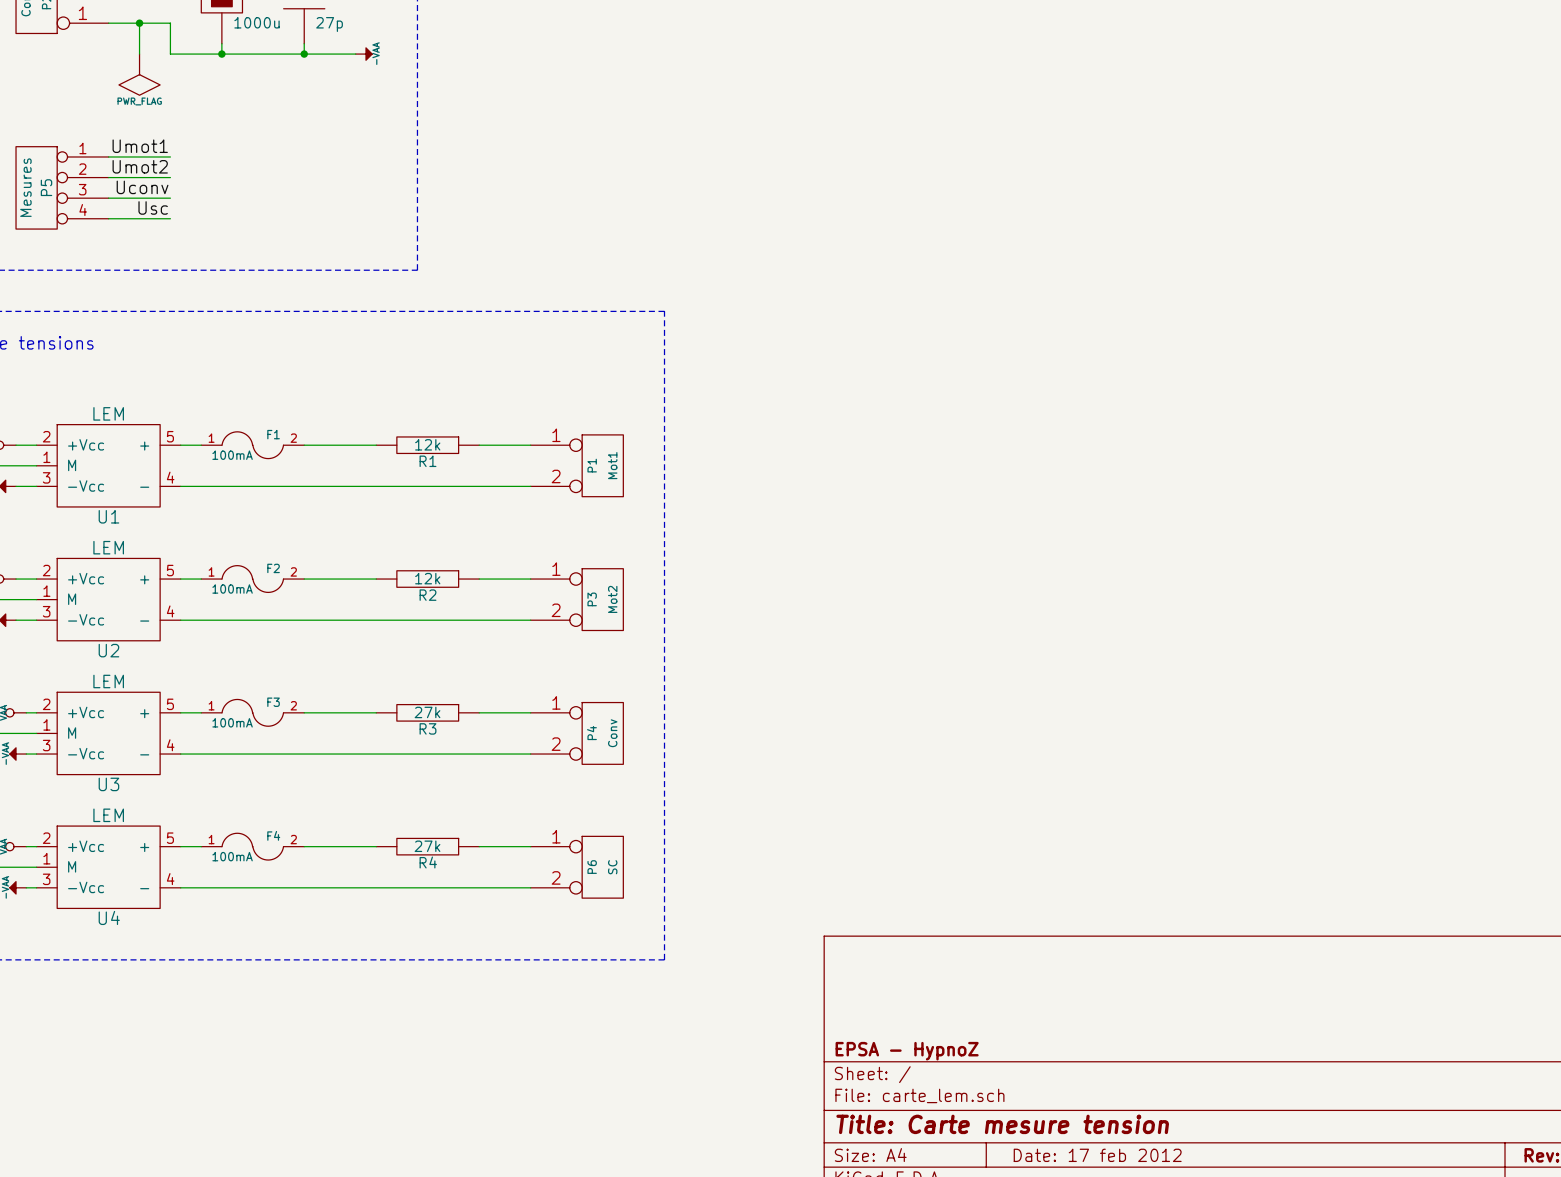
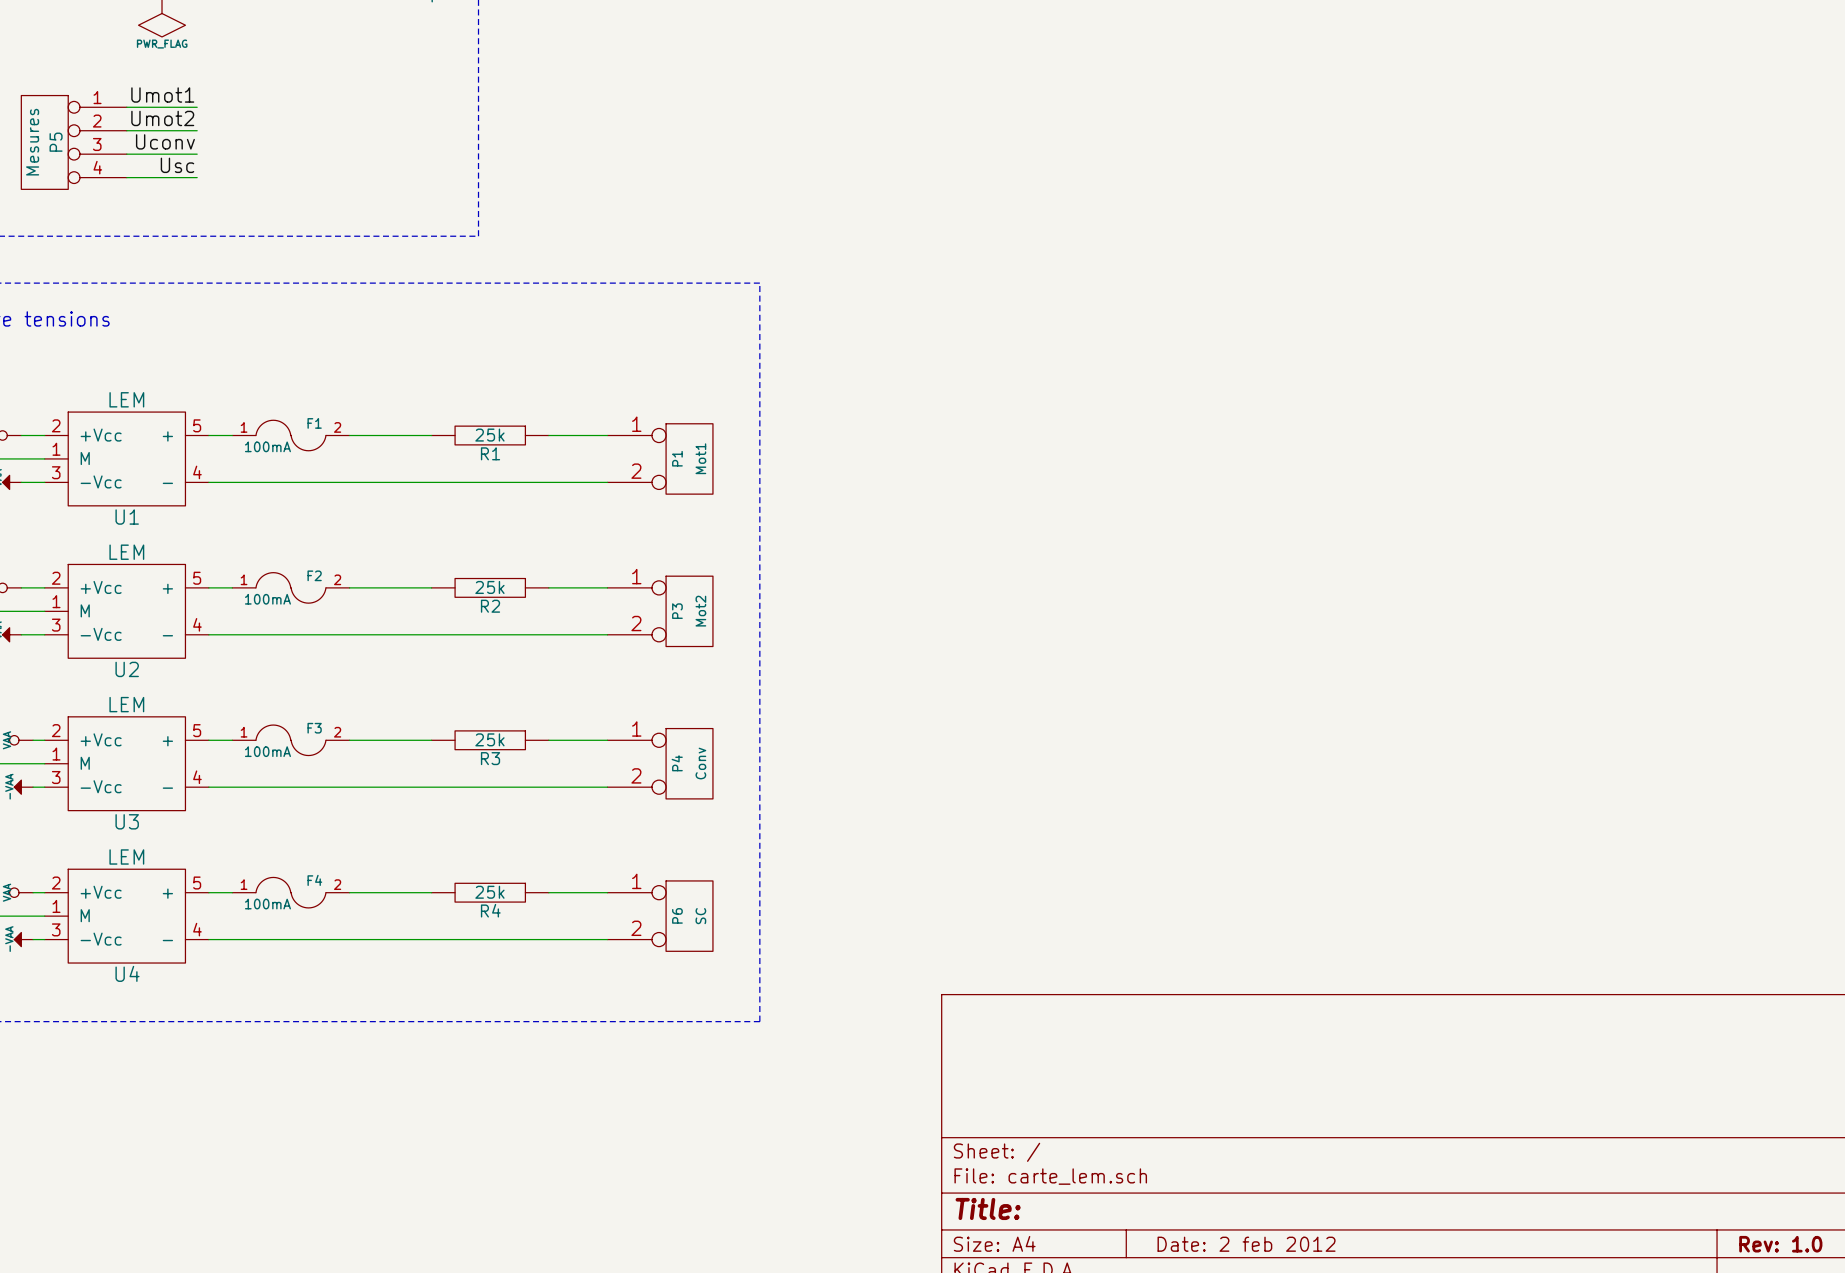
R1 value: 12k (427, 444) -> 25k (489, 435)
R2 value: 12k (427, 578) -> 25k (489, 587)
R3 value: 27k (427, 712) -> 25k (489, 739)
R4 value: 27k (427, 846) -> 25k (489, 892)
title block: EPSA - HypnoZ (907, 1051) -> none
title block: Title: Carte mesure tension (1002, 1124) -> Title: (988, 1208)
title block: Date: 17 feb 2012 (1097, 1155) -> Date: 2 feb 2012 (1246, 1244)

